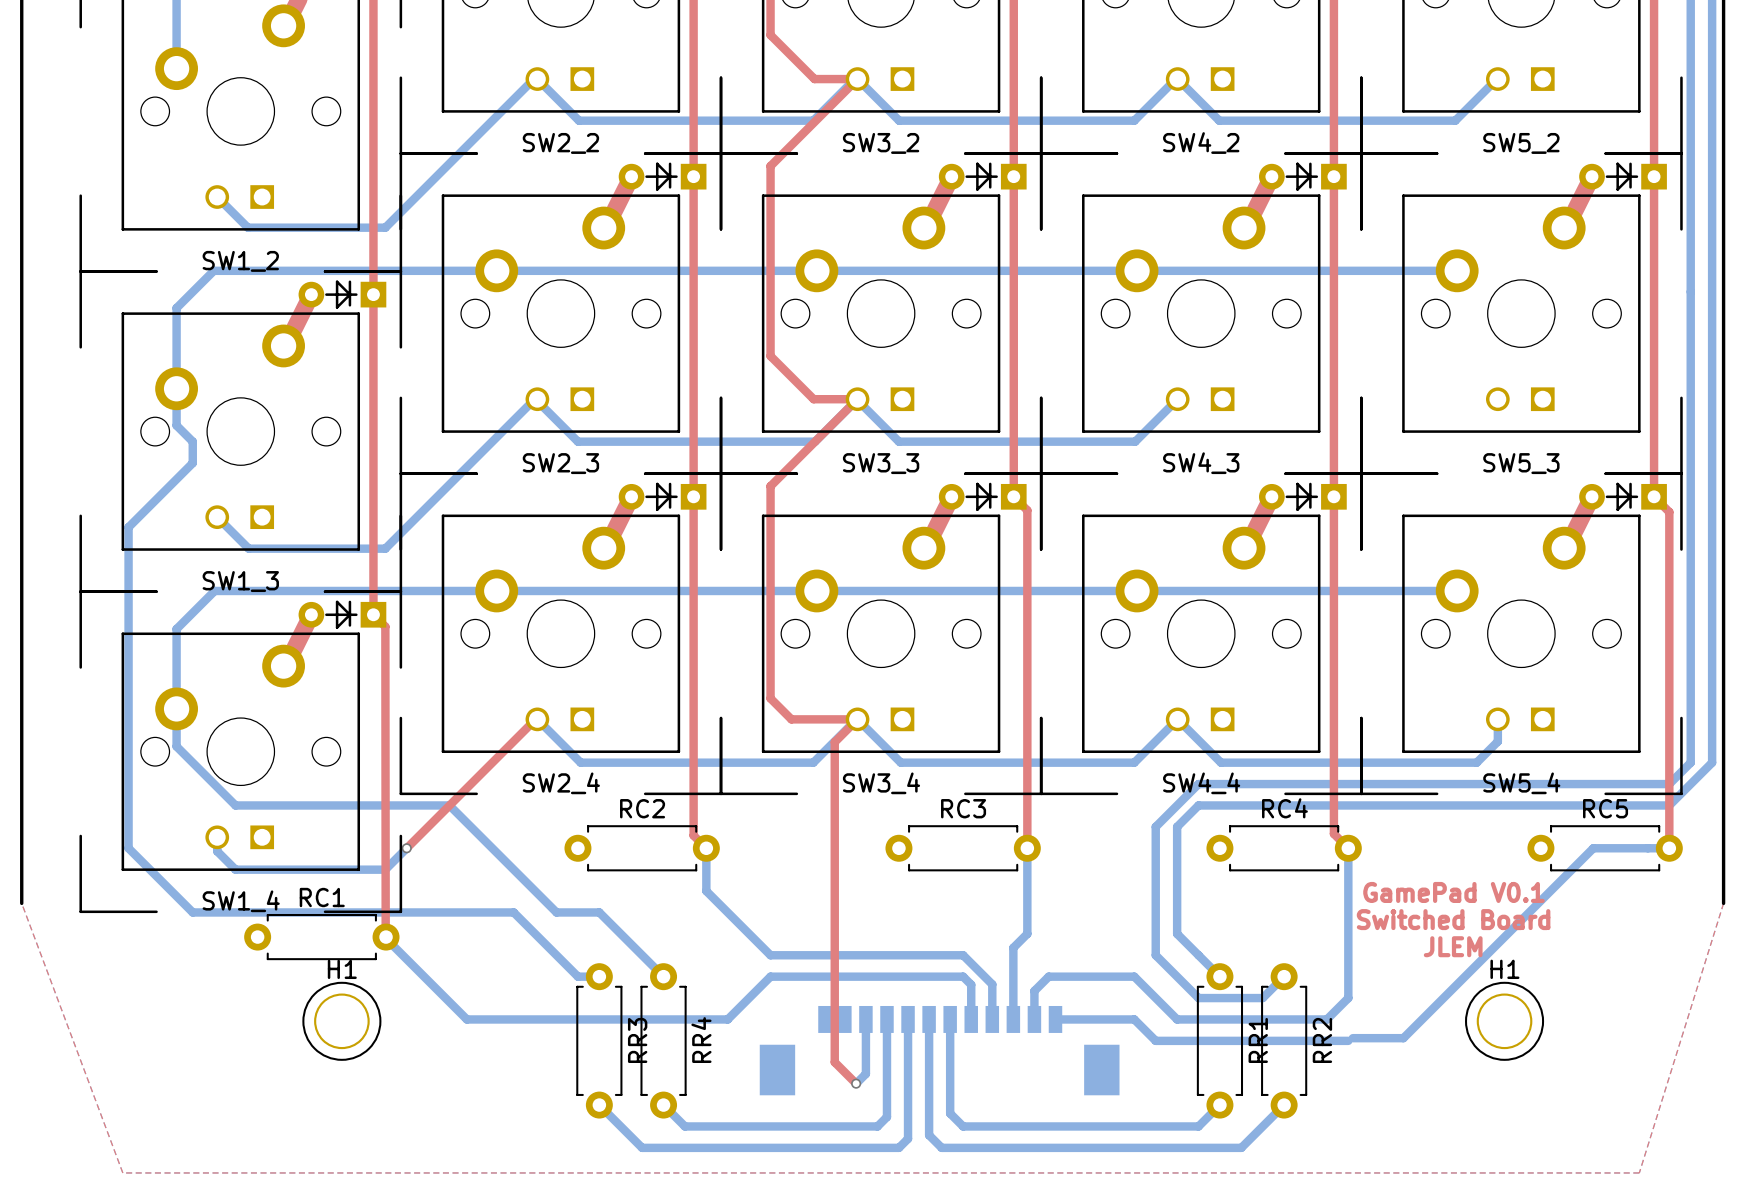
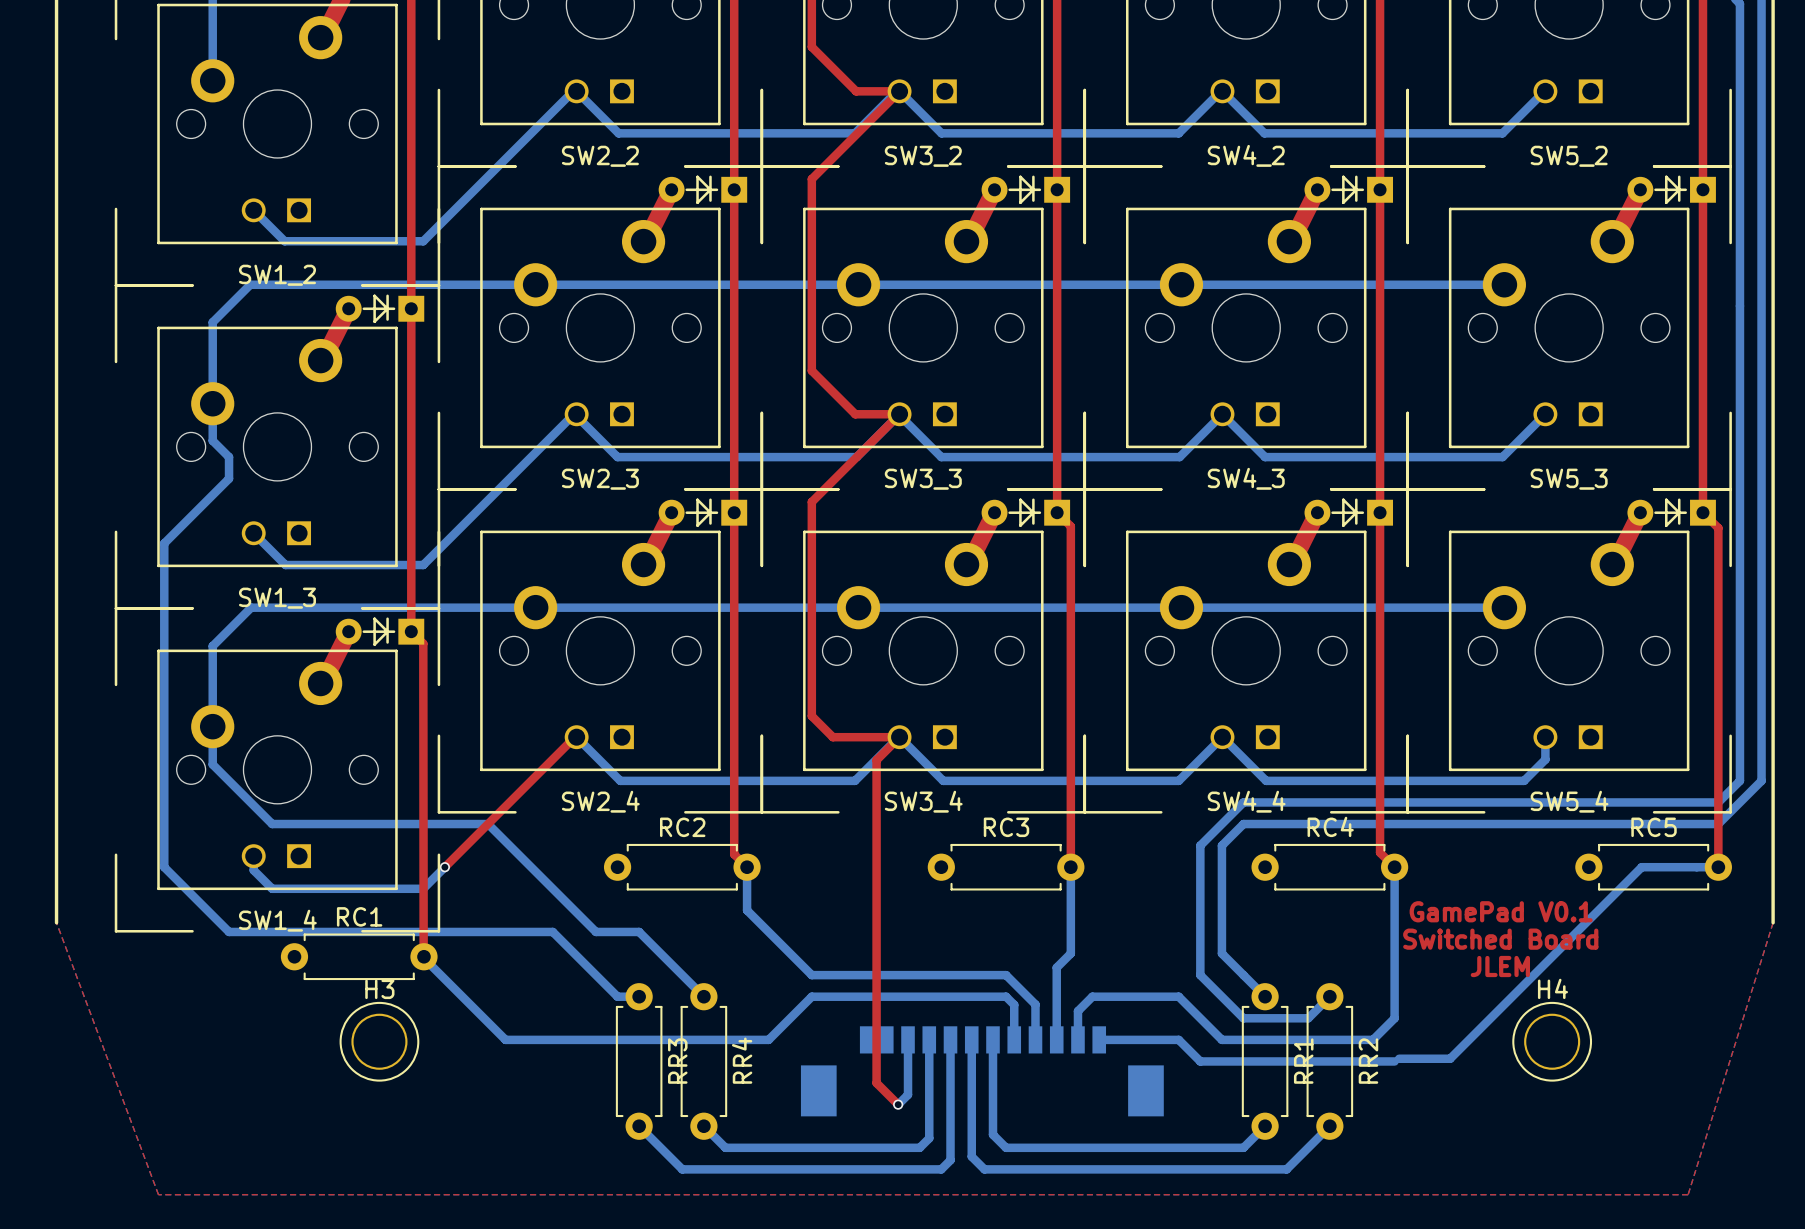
bottom track: none -> (1545, 414) (1502, 457) (1265, 457) (1222, 414)
H1 name: H1 (342, 969) -> H3 (379, 989)
H1 name: H1 (1504, 969) -> H4 (1552, 988)

